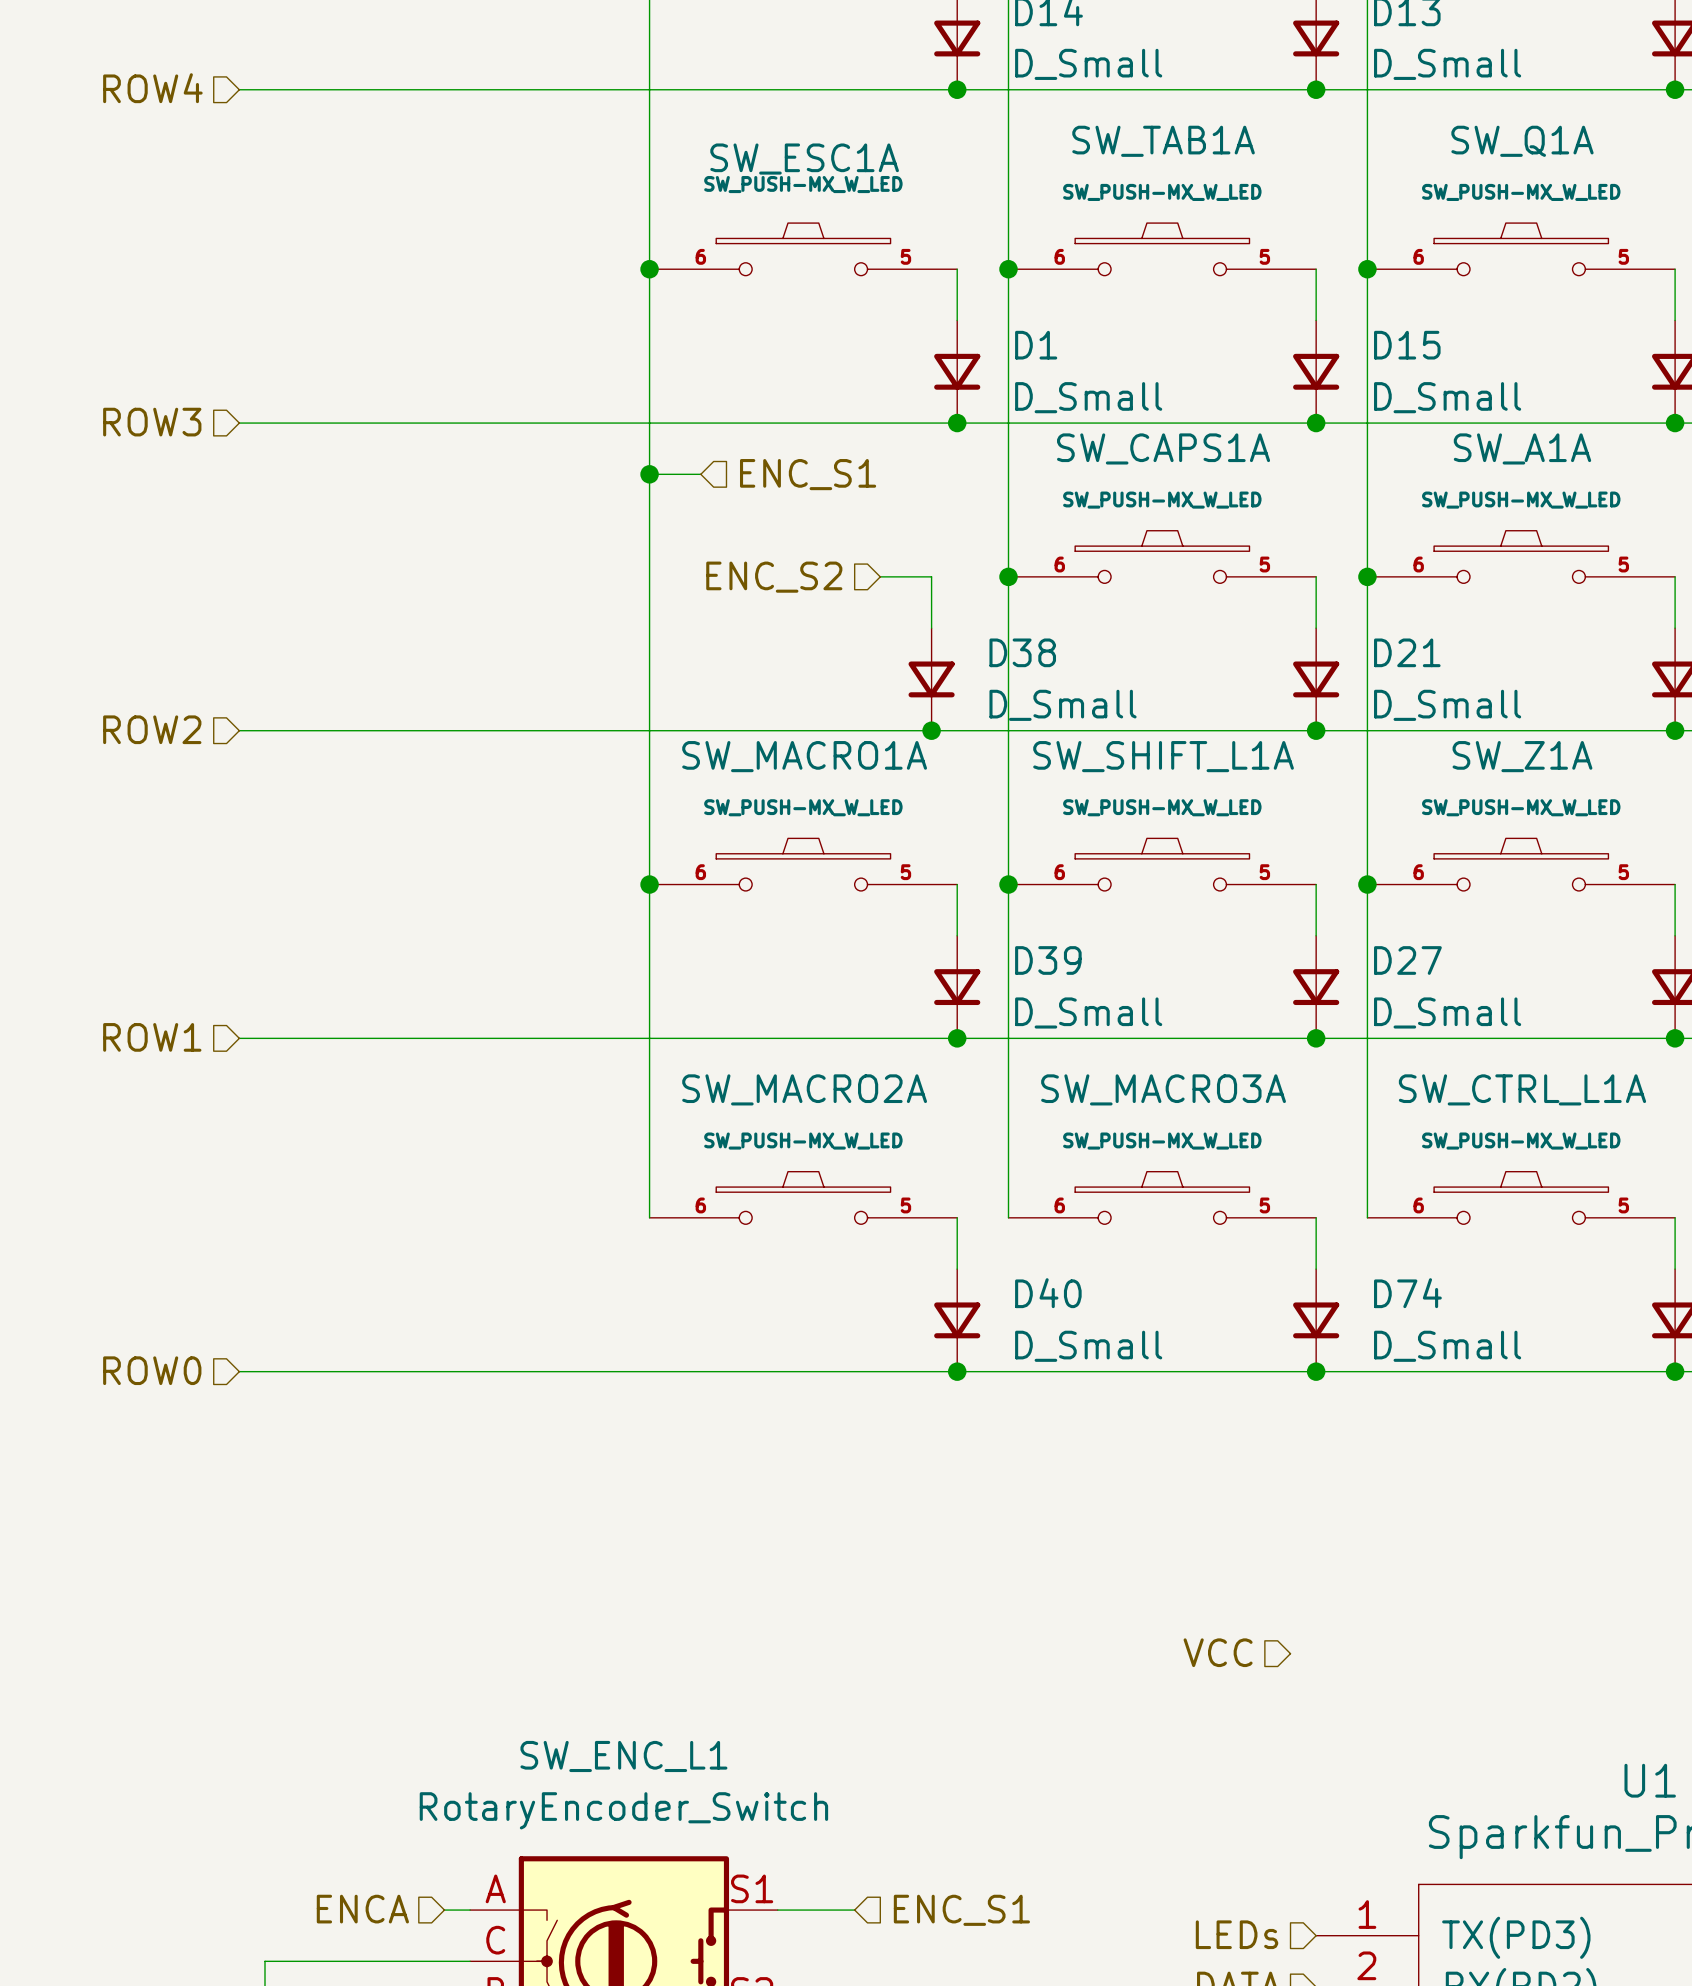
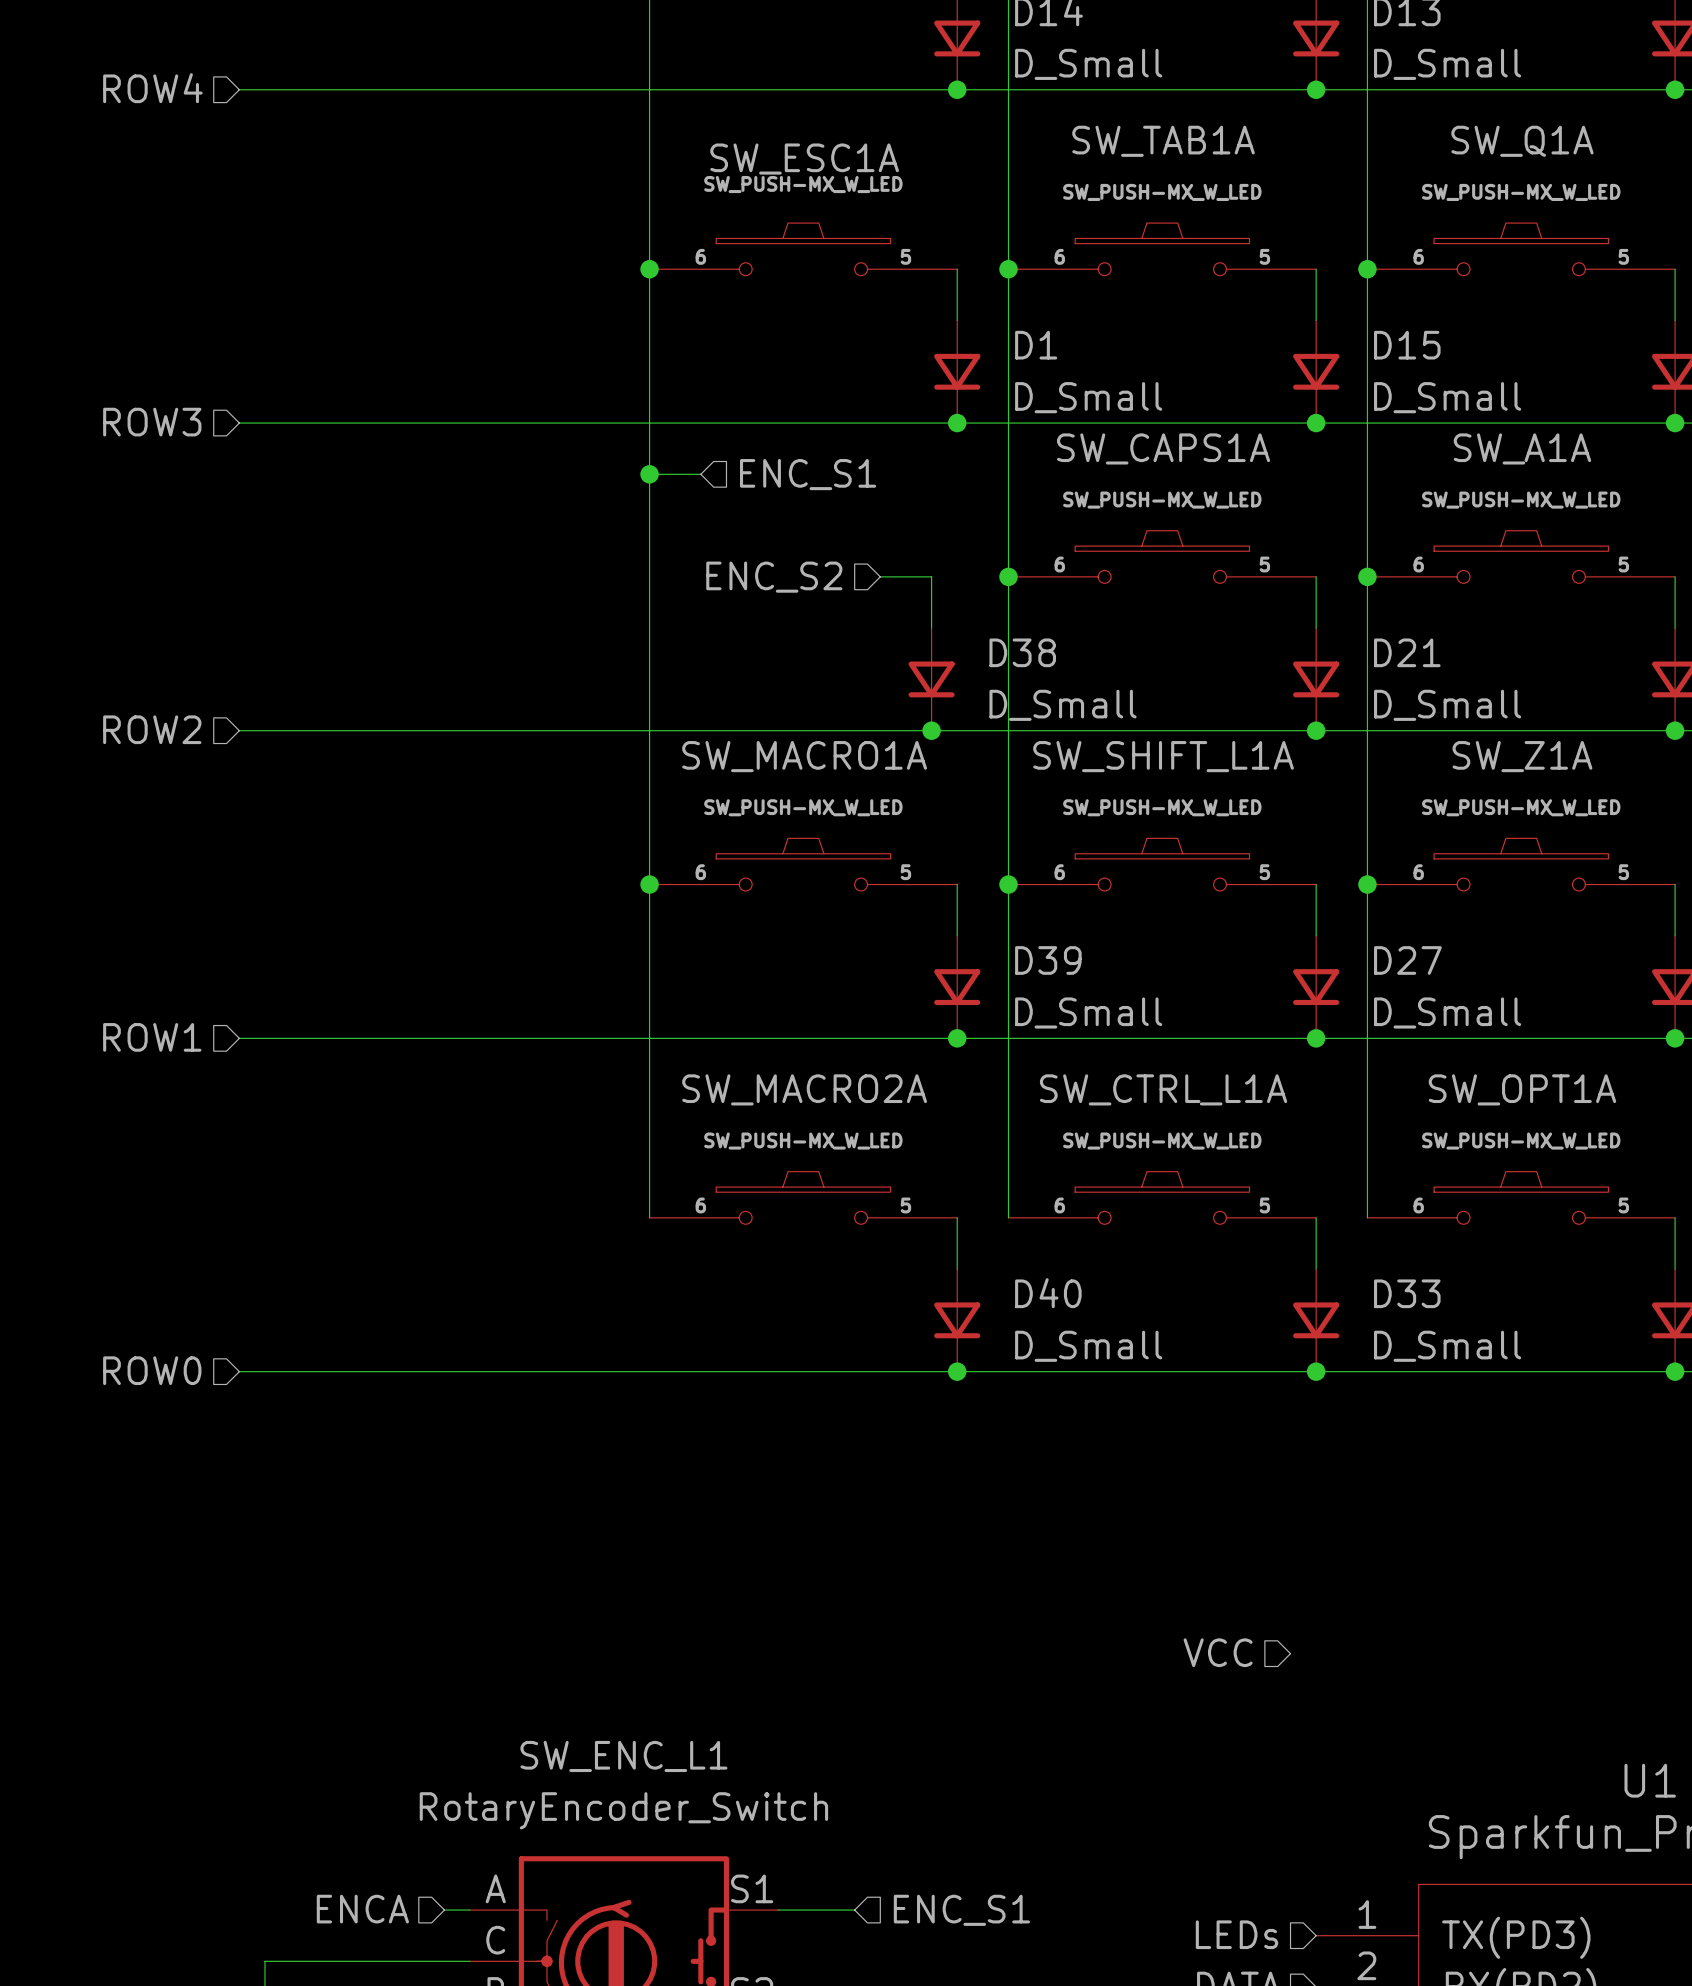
SW_MACRO3A name: SW_MACRO3A (1163, 1089) -> SW_CTRL_L1A (1163, 1089)
SW_CTRL_L1A name: SW_CTRL_L1A (1522, 1089) -> SW_OPT1A (1522, 1089)
D74 name: D74 (1407, 1293) -> D33 (1407, 1293)

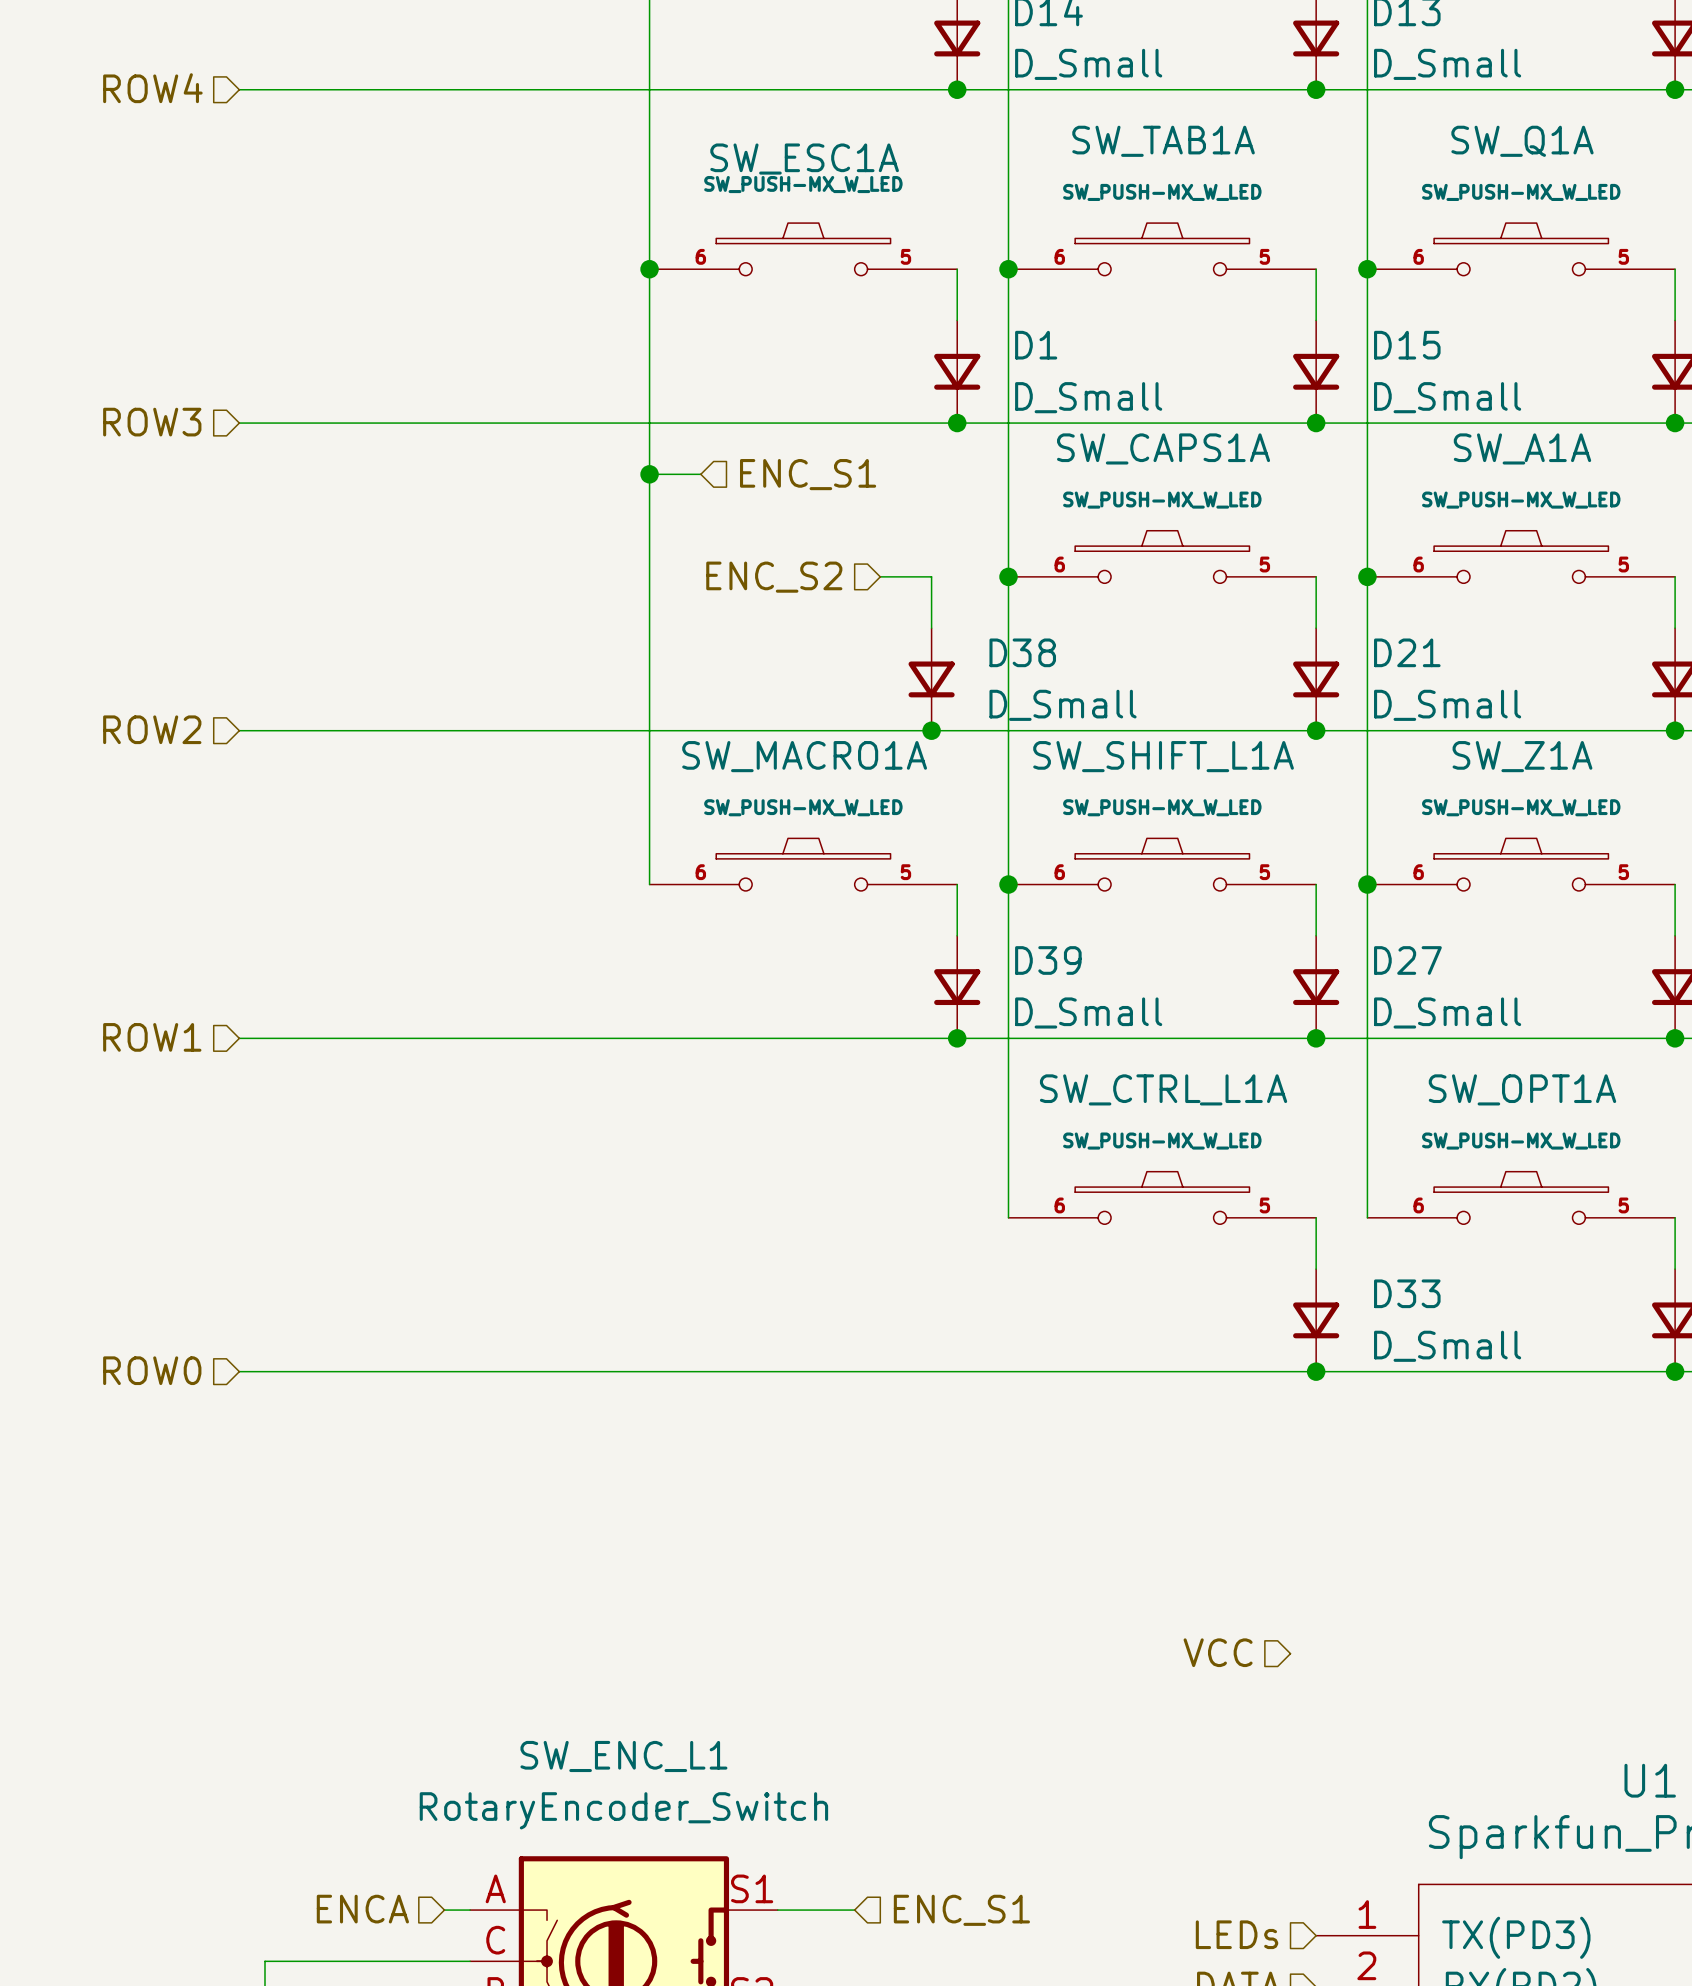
wire: (649, 884) (649, 1217) -> none
junction: (649, 884) -> none
SW_MACRO2A: SW_PUSH-MX_W_LED (803, 1197) -> none
wire: (957, 1217) (957, 1269) -> none
D40: D_Small (957, 1320) -> none
junction: (957, 1371) -> none

